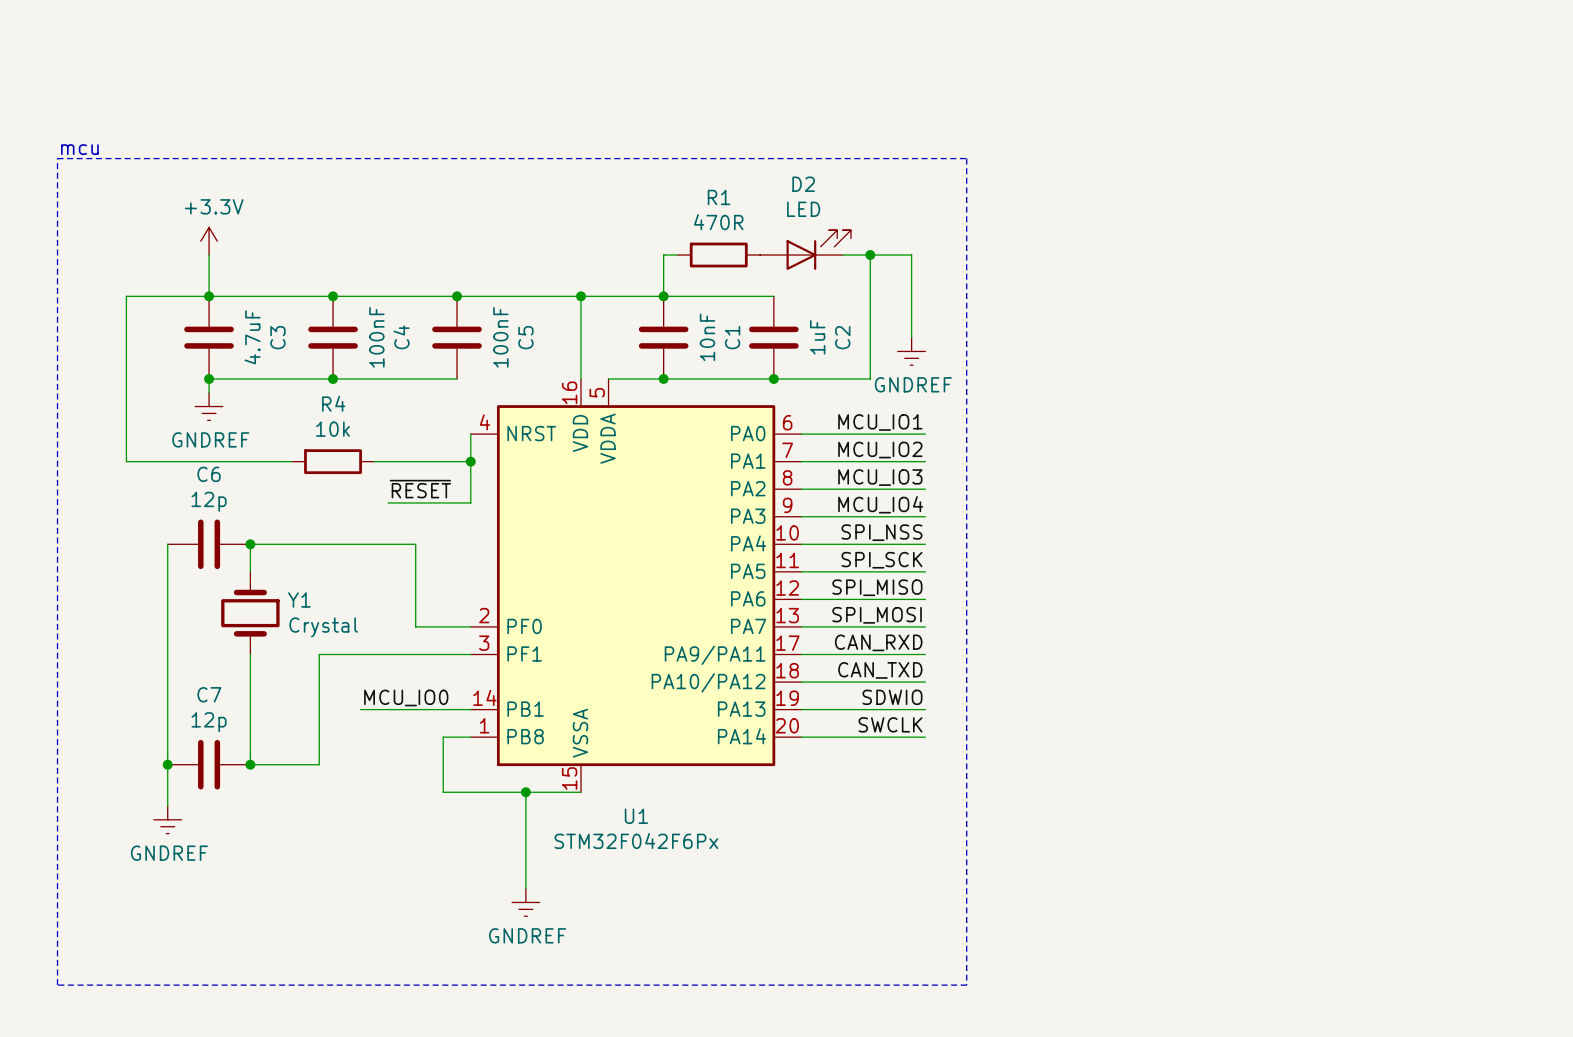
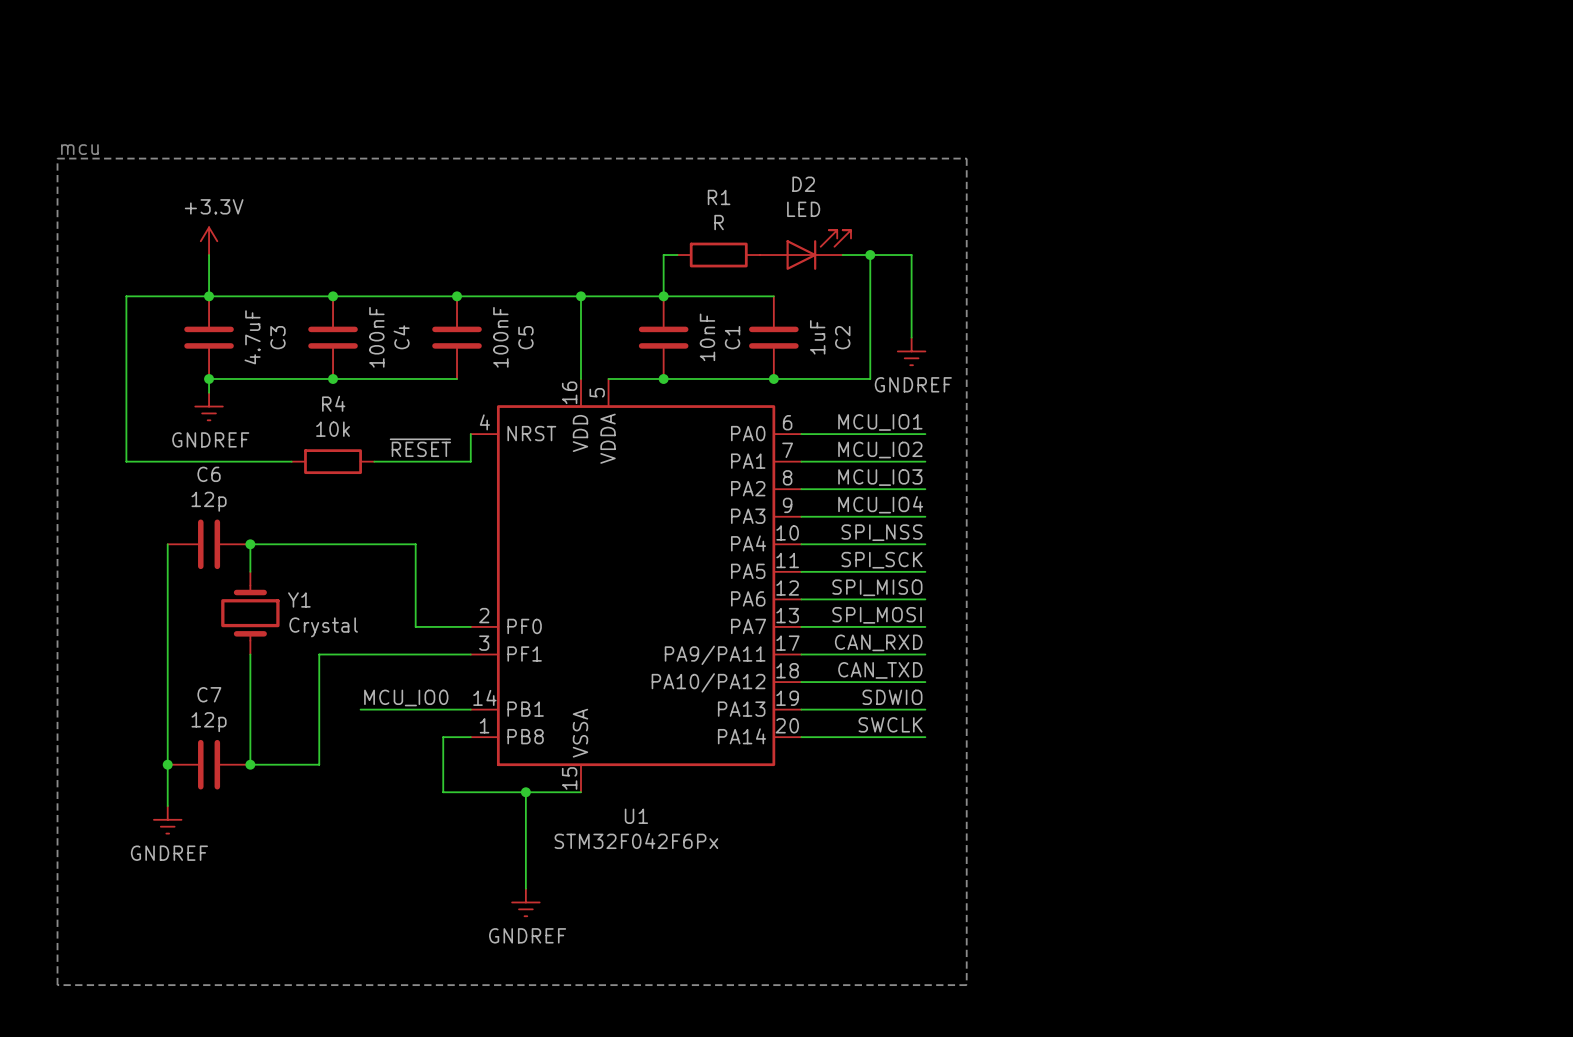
R1 value: 470R (718, 222) -> R (719, 222)
wire: (470, 461) (470, 502) (388, 502) -> none
junction: (470, 461) -> none
label position: ~{RESET} (420, 489) -> ~{RESET} (420, 447)

